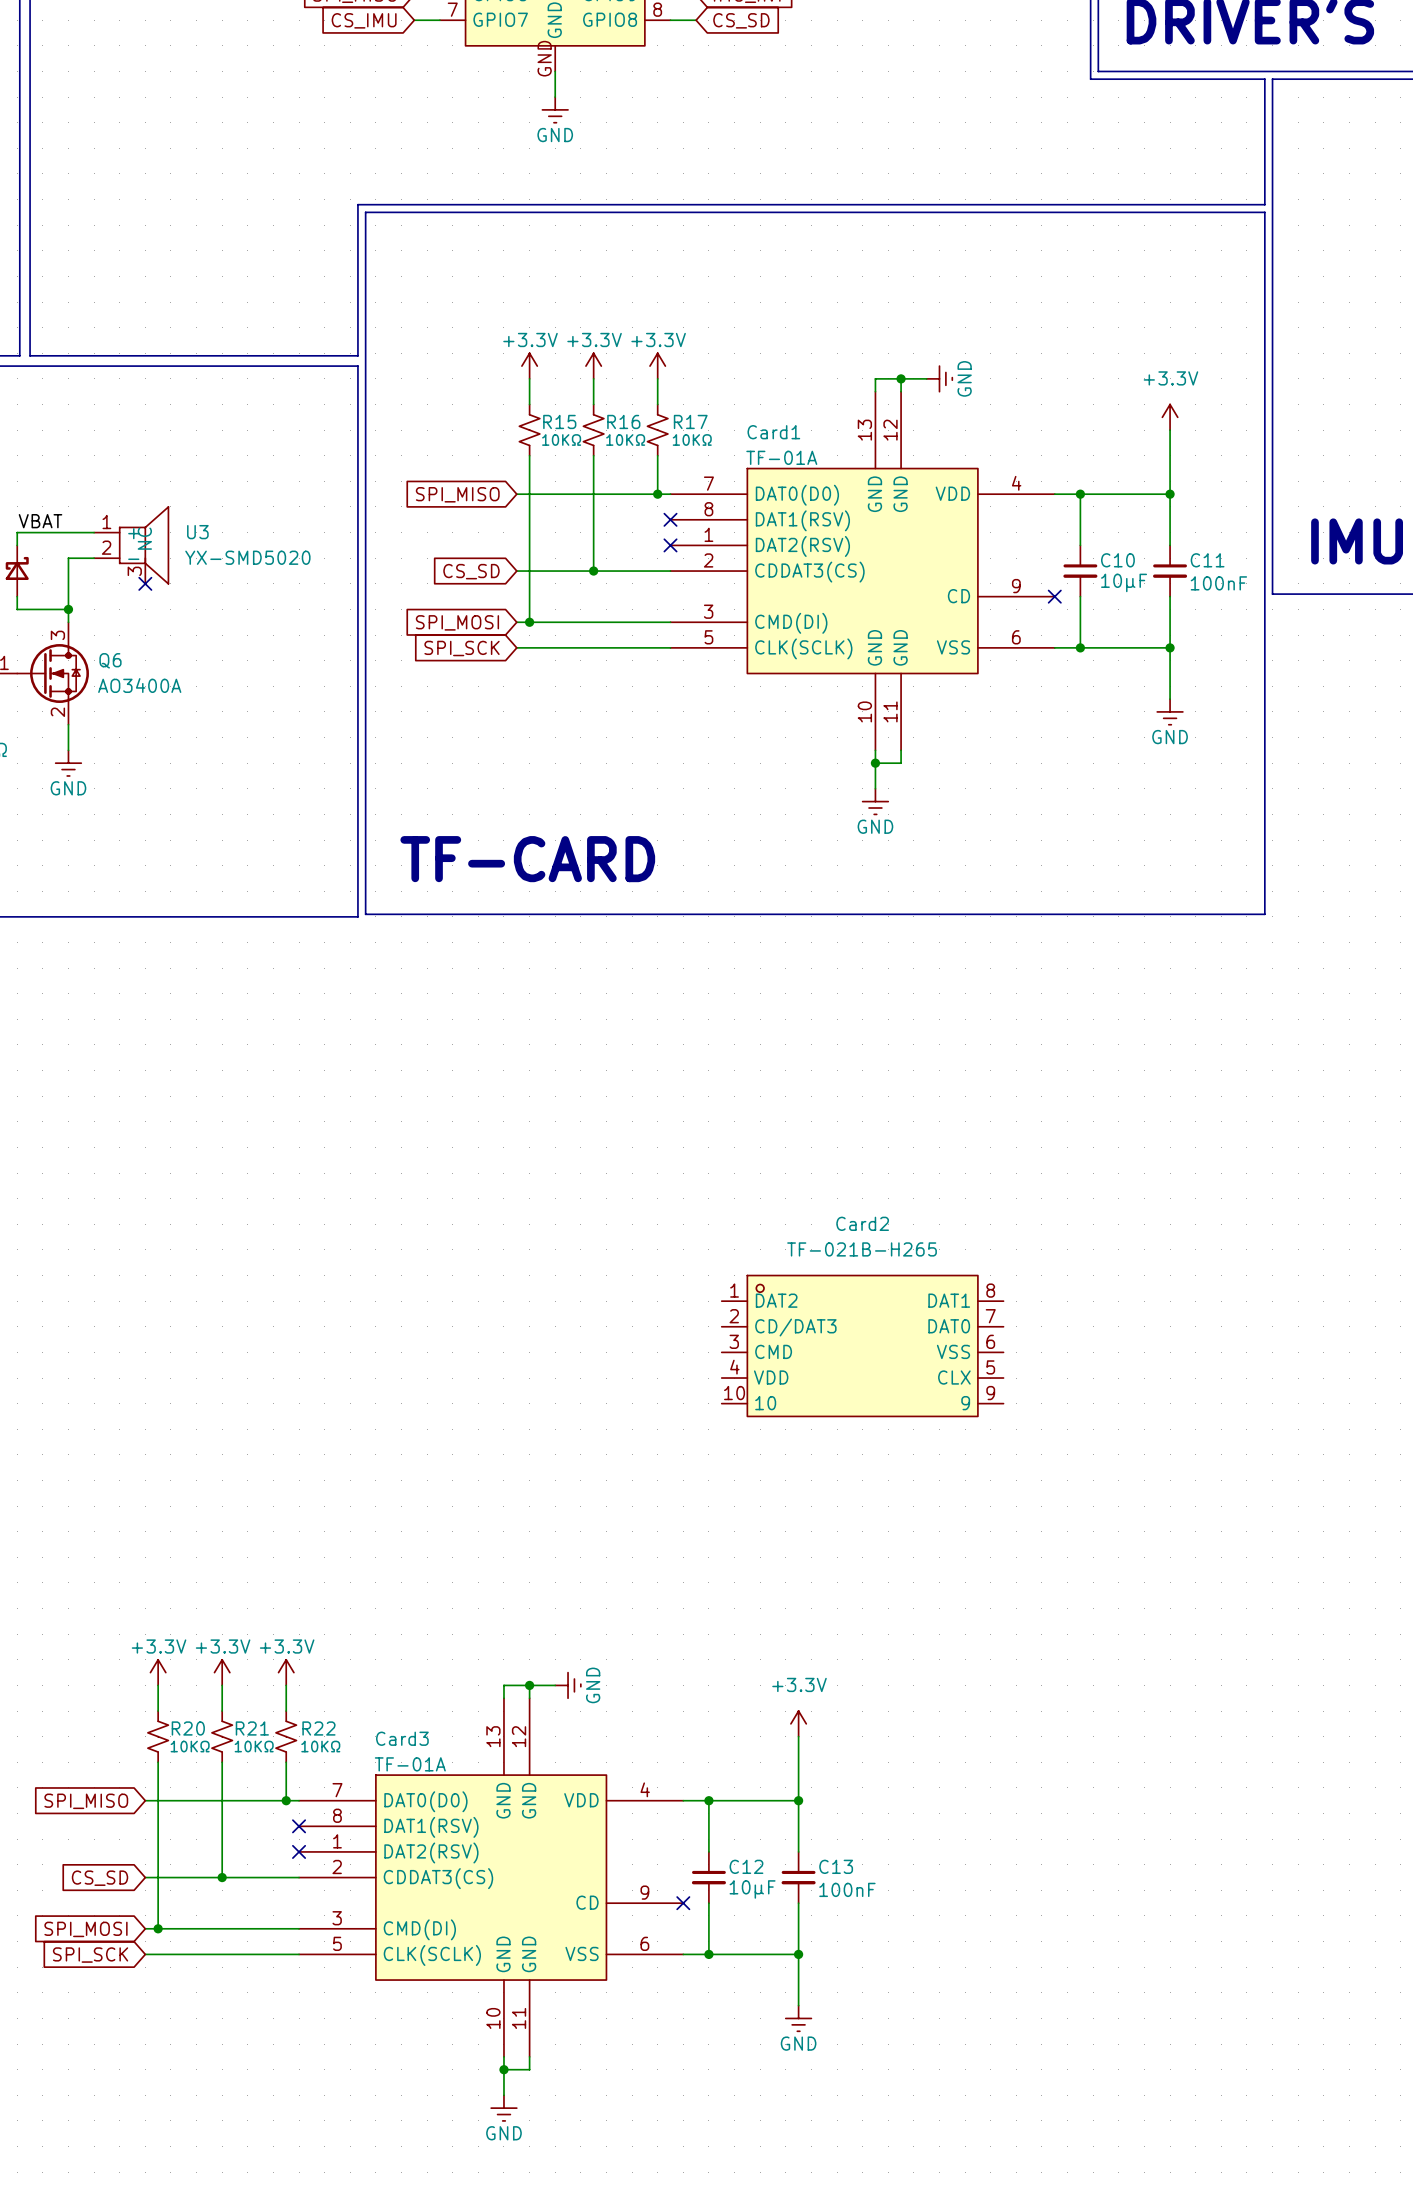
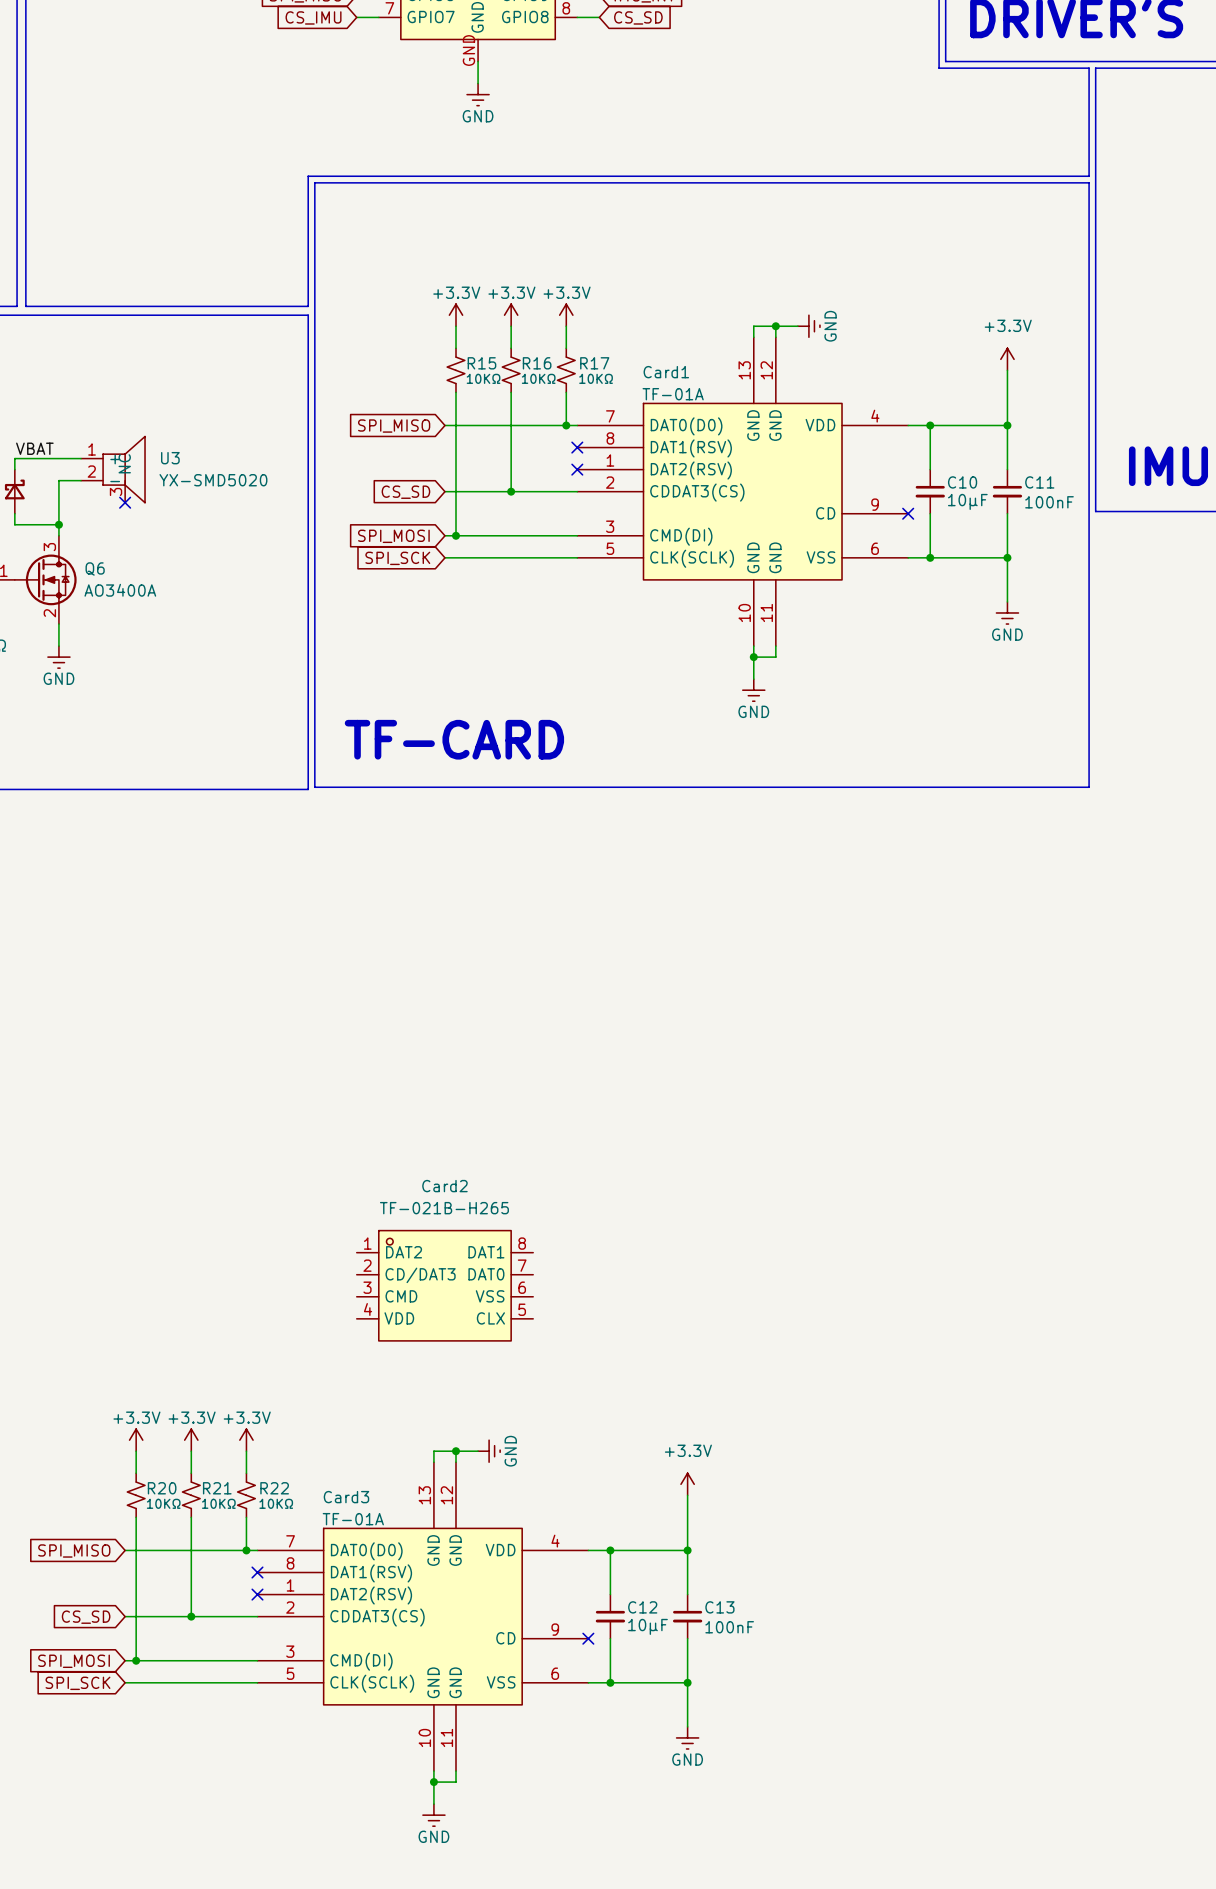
Card2 symbol: [721, 1275, 1004, 1417] -> [356, 1230, 534, 1341]

